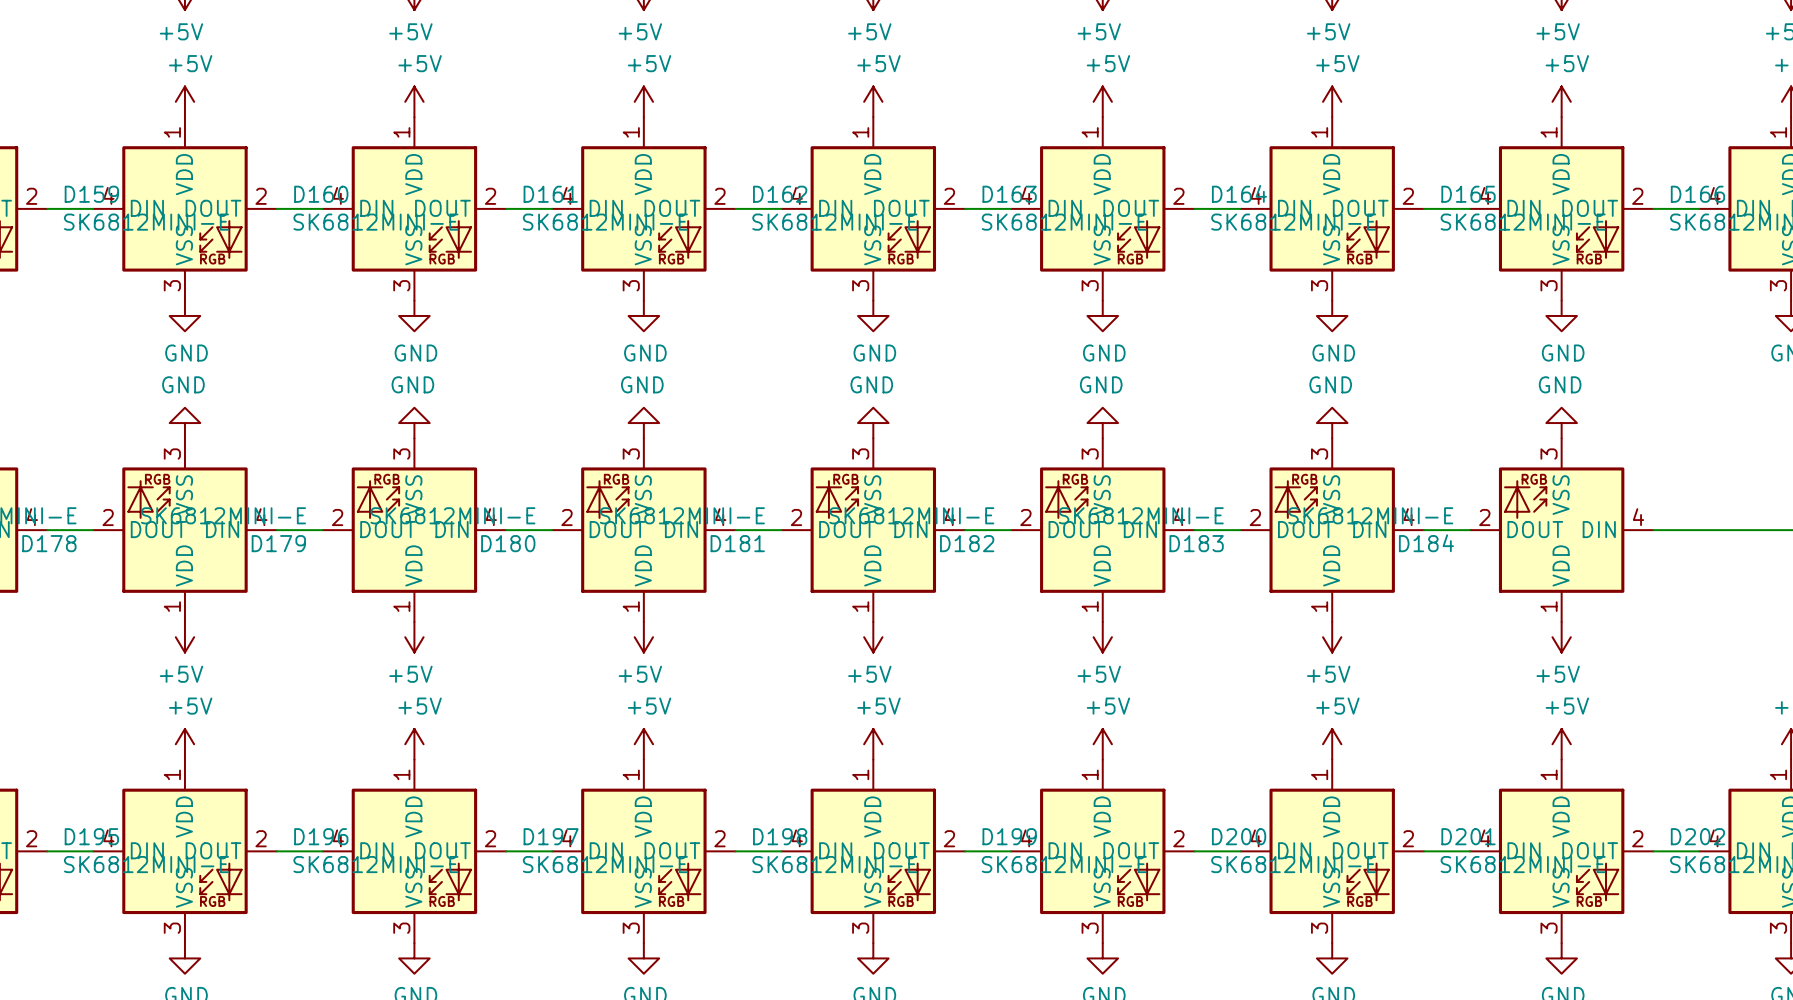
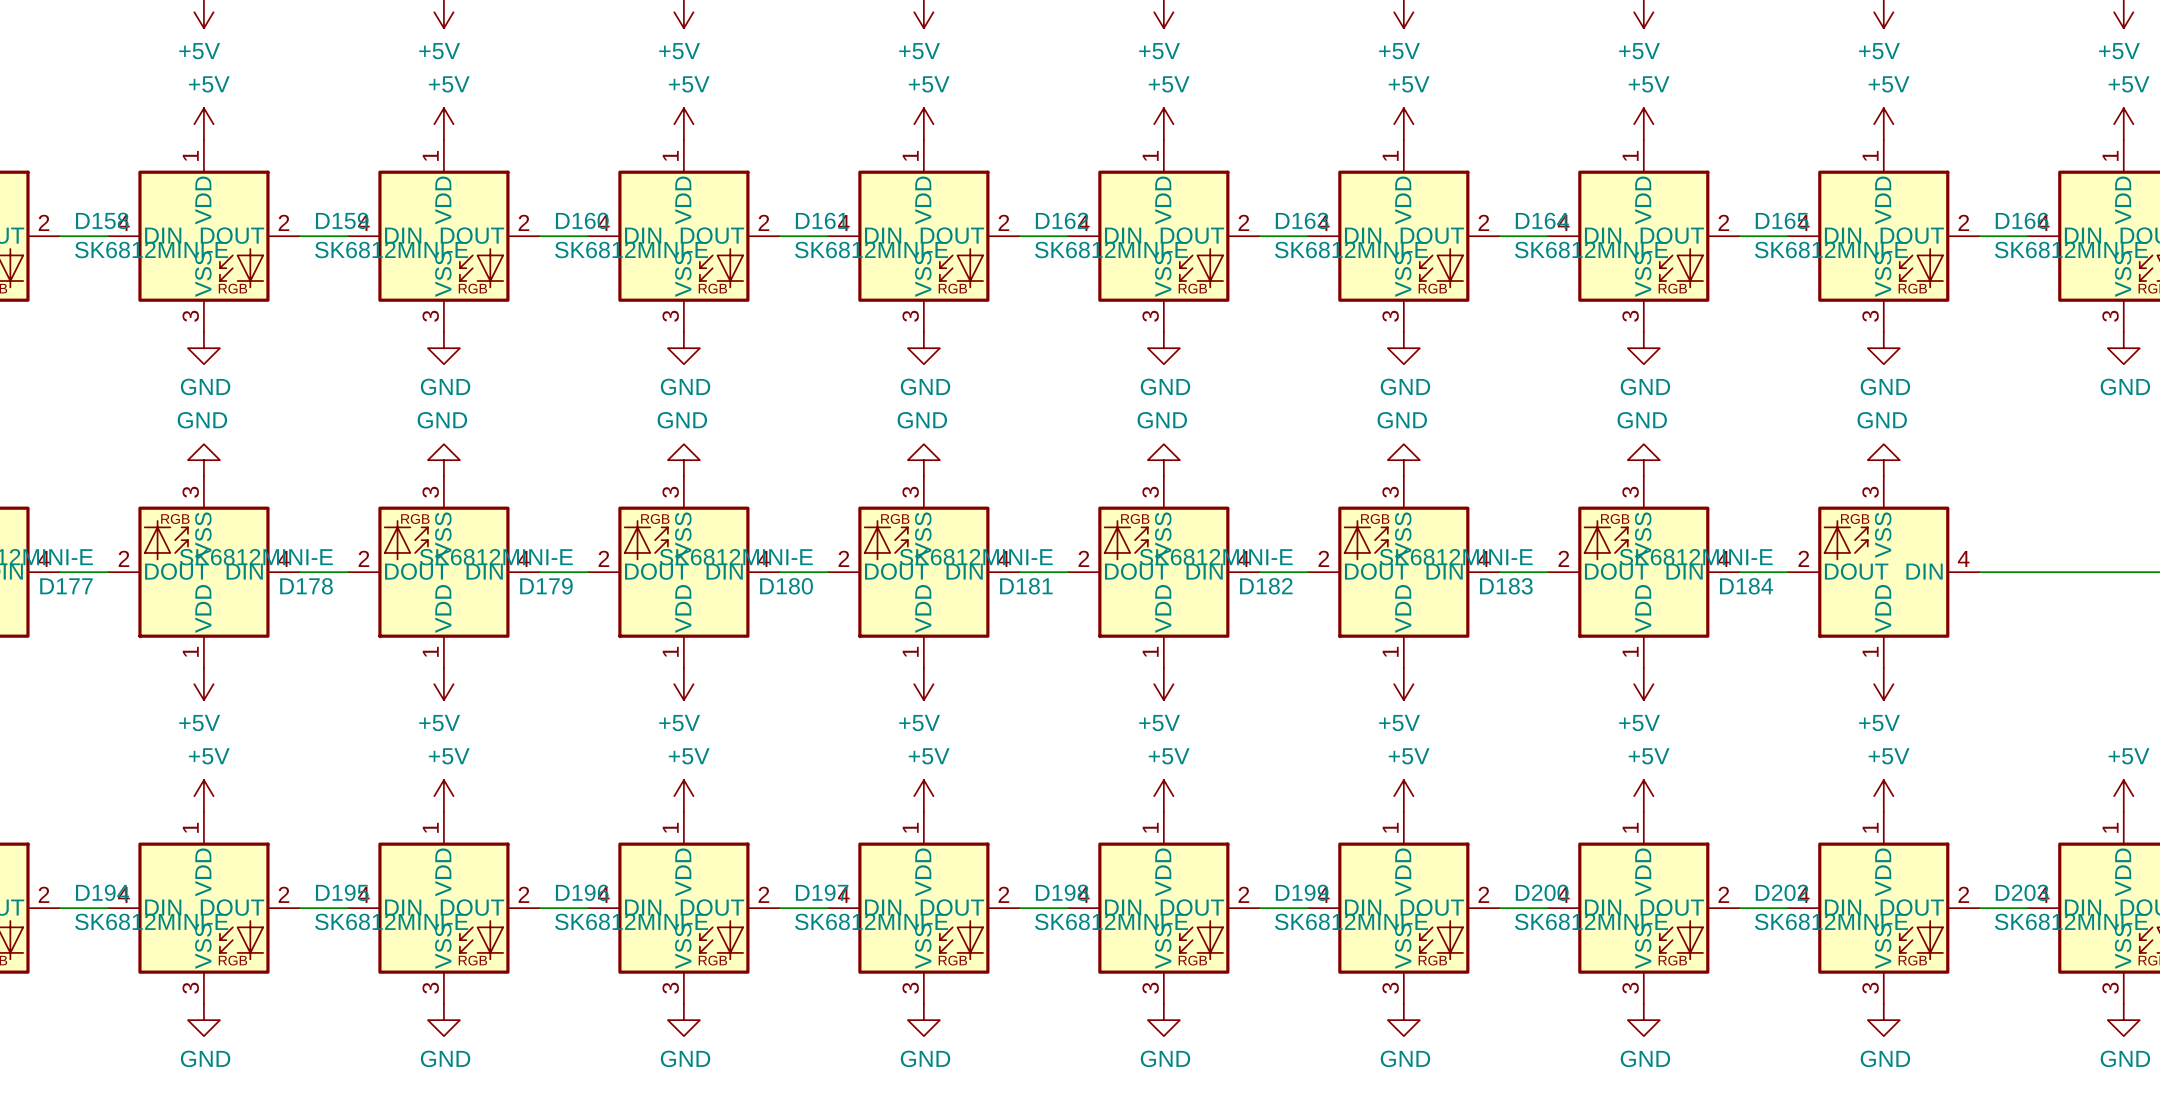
D201 name: D201 (1468, 836) -> D202 (1782, 892)
D202 name: D202 (1697, 836) -> D203 (2022, 892)

